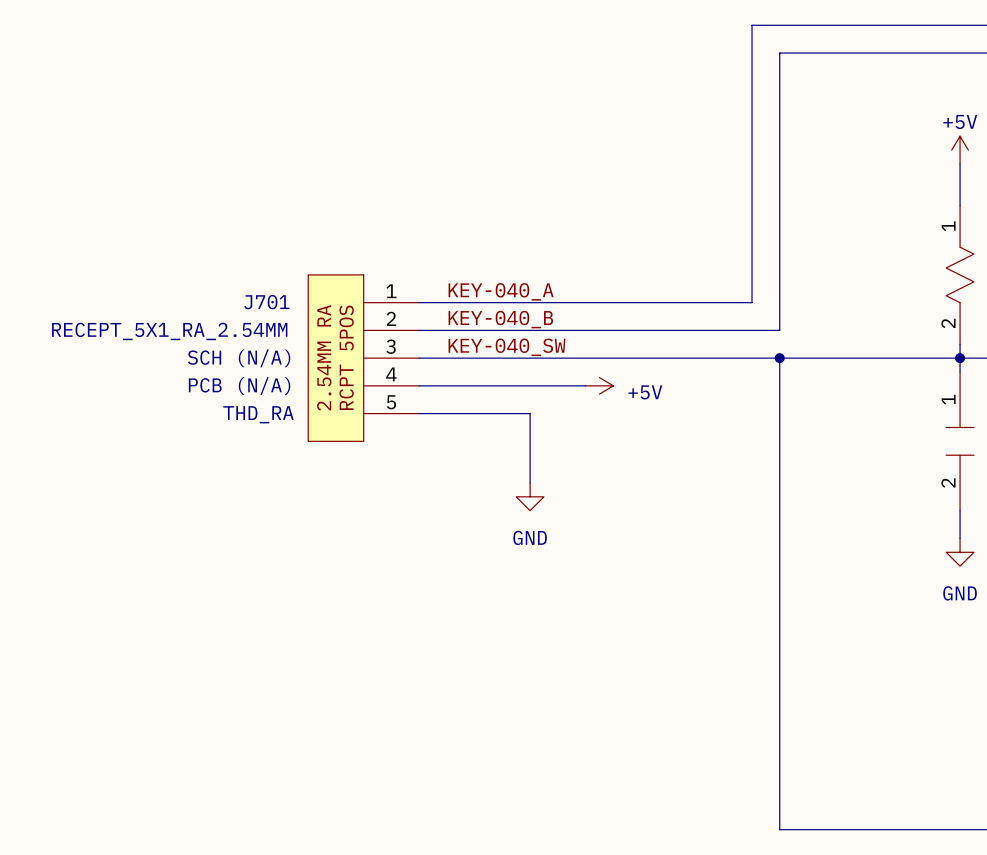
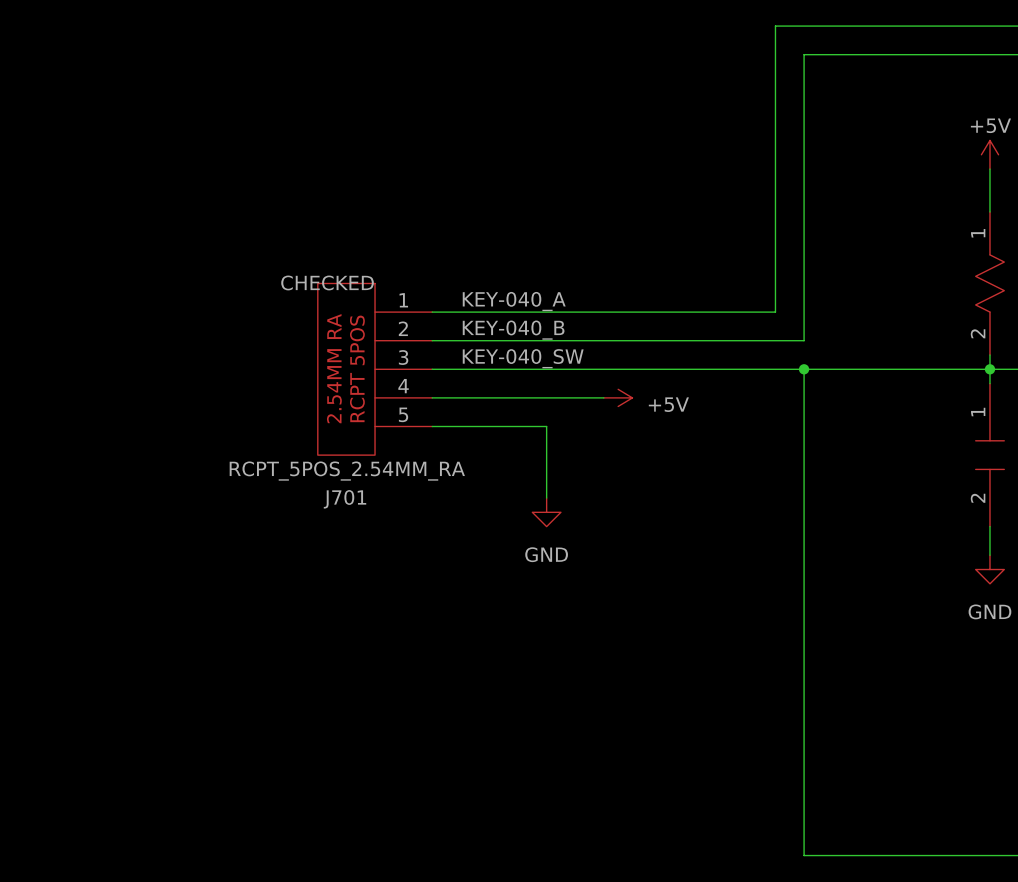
J701 name position: J701 (266, 302) -> J701 (345, 499)
J701 value: RECEPT_5X1_RA_2.54MM (169, 331) -> RCPT_5POS_2.54MM_RA (347, 471)
J701 text: SCH (N/A) (239, 358) -> CHECKED (327, 282)
J701 text: PCB (N/A) (239, 386) -> none
J701 text: THD_RA (258, 414) -> none

